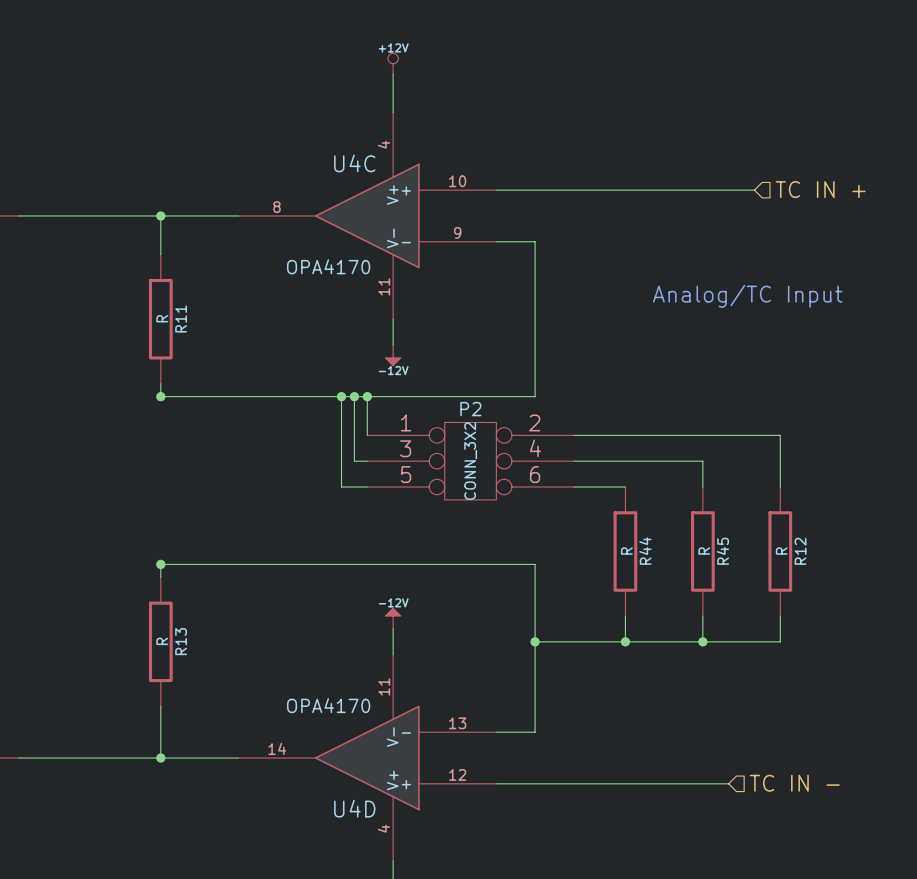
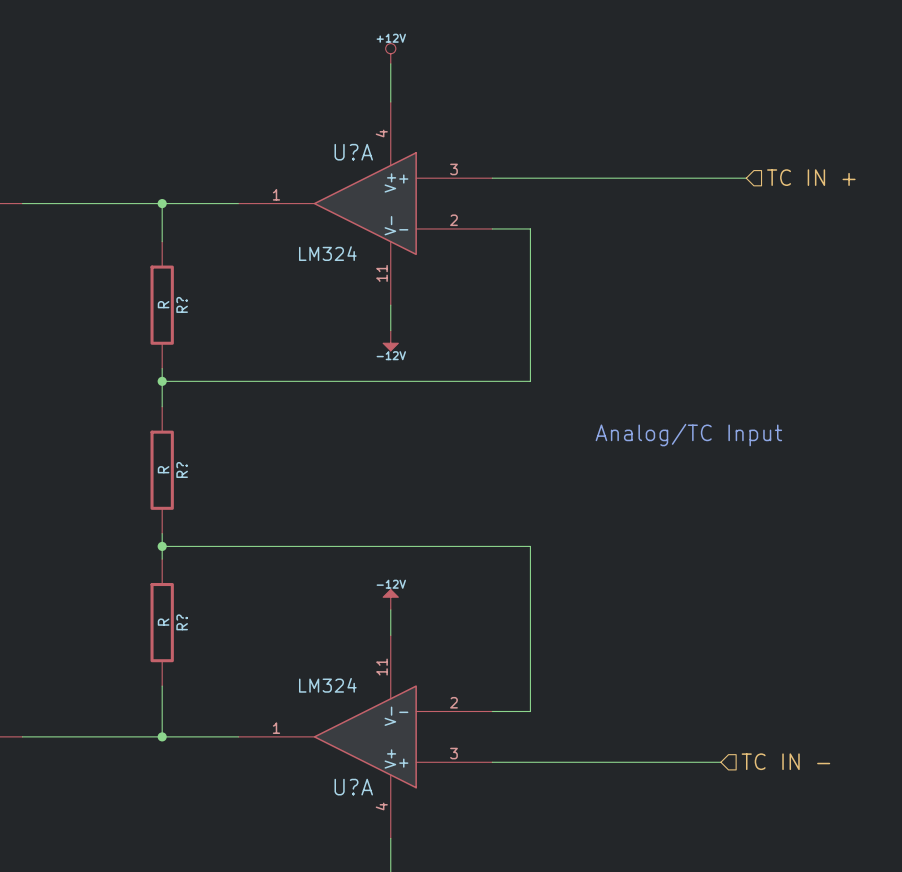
U4C name: U4C (354, 163) -> U?A (353, 152)
U4C pin number: 10 (457, 181) -> 3 (454, 169)
U4C pin number: 8 (276, 207) -> 1 (276, 194)
U4C pin number: 9 (457, 232) -> 2 (454, 220)
U4C value: OPA4170 (328, 266) -> LM324 (327, 253)
text position: Analog/TC Input (747, 296) -> Analog/TC Input (688, 435)
R11 name: R11 (181, 318) -> R? (182, 304)
wire: none -> (162, 381) (162, 406)
wire: (341, 396) (341, 486) (367, 486) -> none
junction: (341, 396) -> none
wire: (354, 396) (354, 461) (367, 461) -> none
junction: (354, 396) -> none
wire: (367, 396) (367, 435) -> none
junction: (367, 396) -> none
wire: (573, 435) (780, 435) (780, 486) -> none
P2: CONN_3X2 (470, 461) -> none
wire: (573, 461) (702, 461) (702, 486) -> none
R?: none -> R (162, 470)
wire: (573, 486) (625, 486) -> none
wire: none -> (162, 533) (162, 546)
R44: R (625, 551) -> none
R45: R (702, 551) -> none
R12: R (780, 551) -> none
wire: (625, 616) (625, 641) -> none
wire: (702, 616) (702, 641) -> none
wire: (780, 616) (780, 641) (535, 641) -> none
R13 name: R13 (181, 641) -> R? (182, 622)
junction: (535, 641) -> none
junction: (625, 641) -> none
junction: (702, 641) -> none
U4D value: OPA4170 (328, 705) -> LM324 (327, 685)
U4D pin number: 13 (457, 723) -> 2 (454, 702)
U4D pin number: 14 (277, 748) -> 1 (276, 728)
U4D pin number: 12 (457, 774) -> 3 (454, 753)
U4D name: U4D (354, 808) -> U?A (353, 787)

